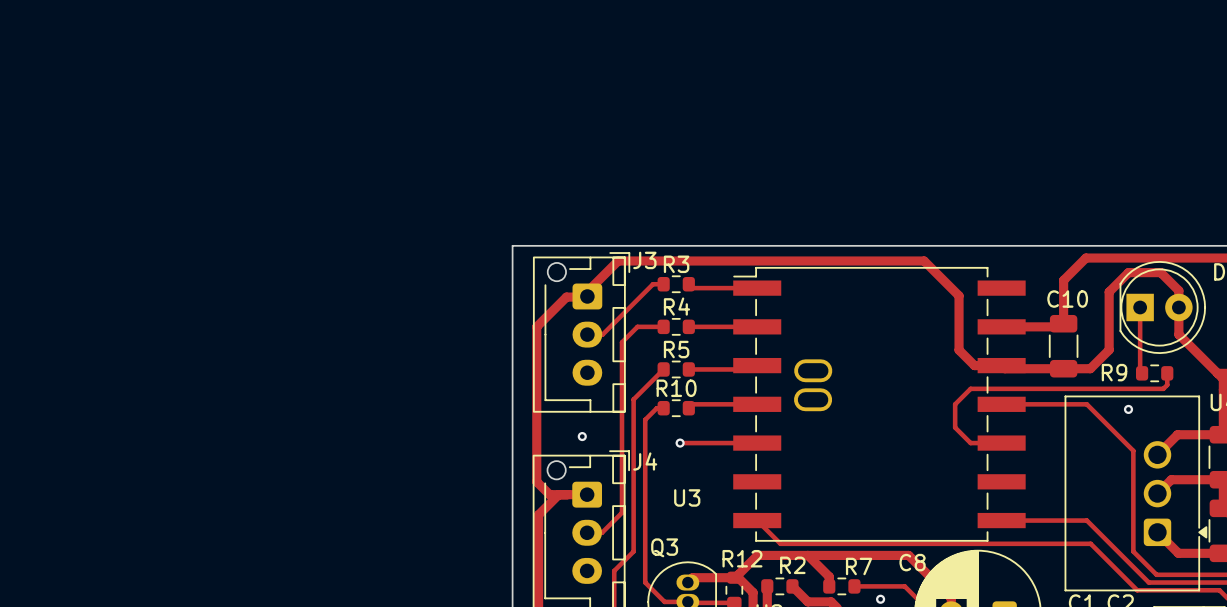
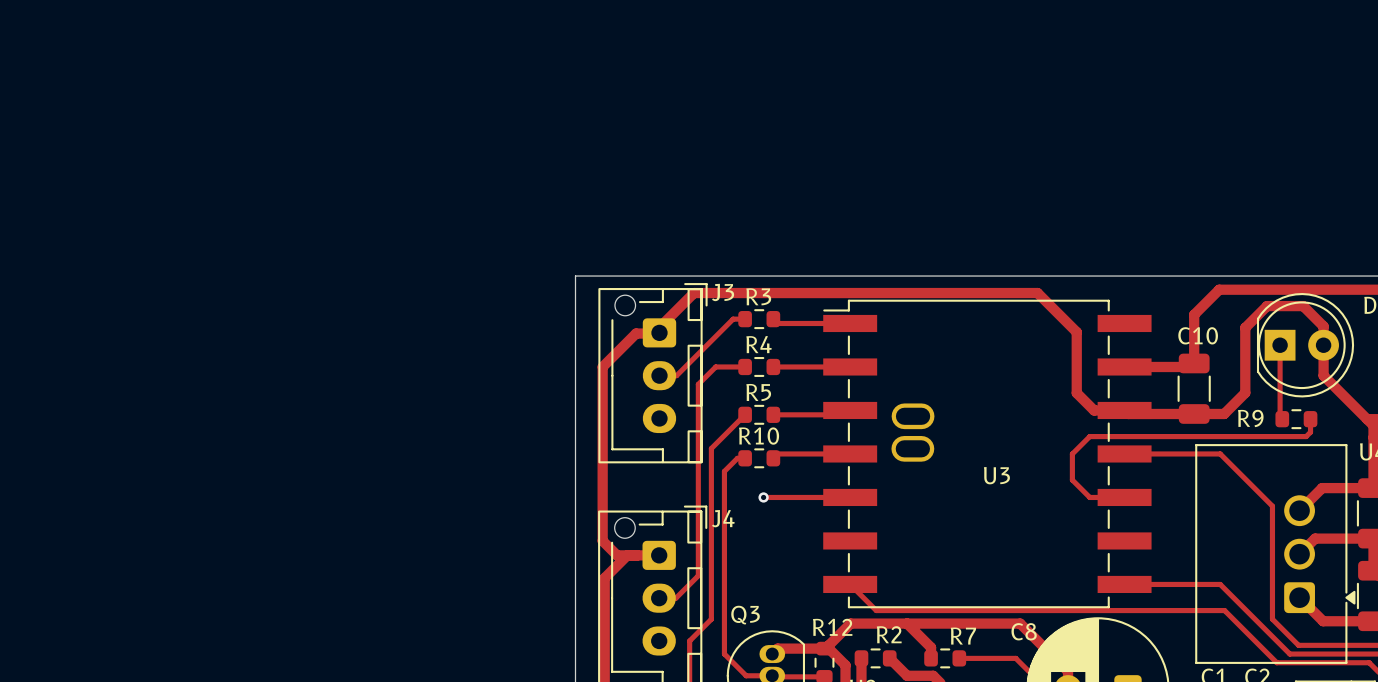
via: (1128, 409) -> none
via: (582, 436) -> none
U3 name position: U3 (687, 497) -> U3 (996, 475)
via: (880, 599) -> none

